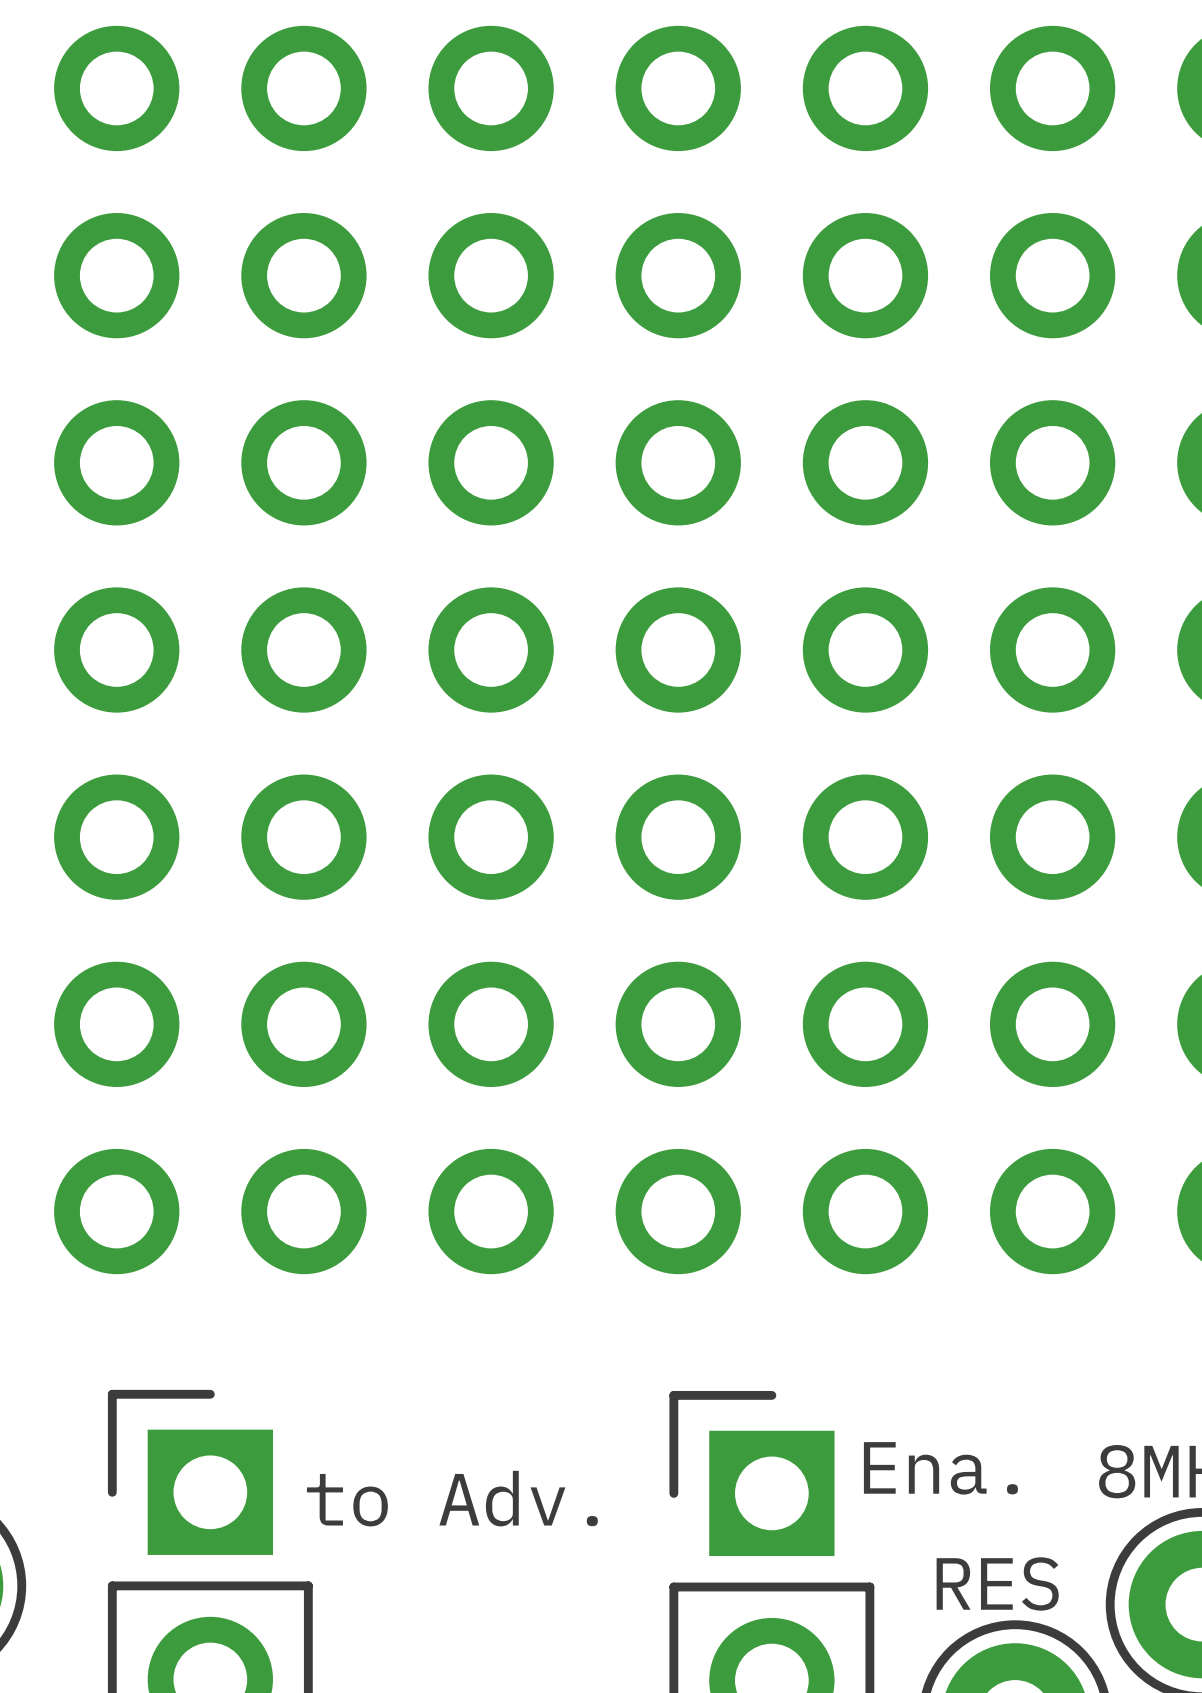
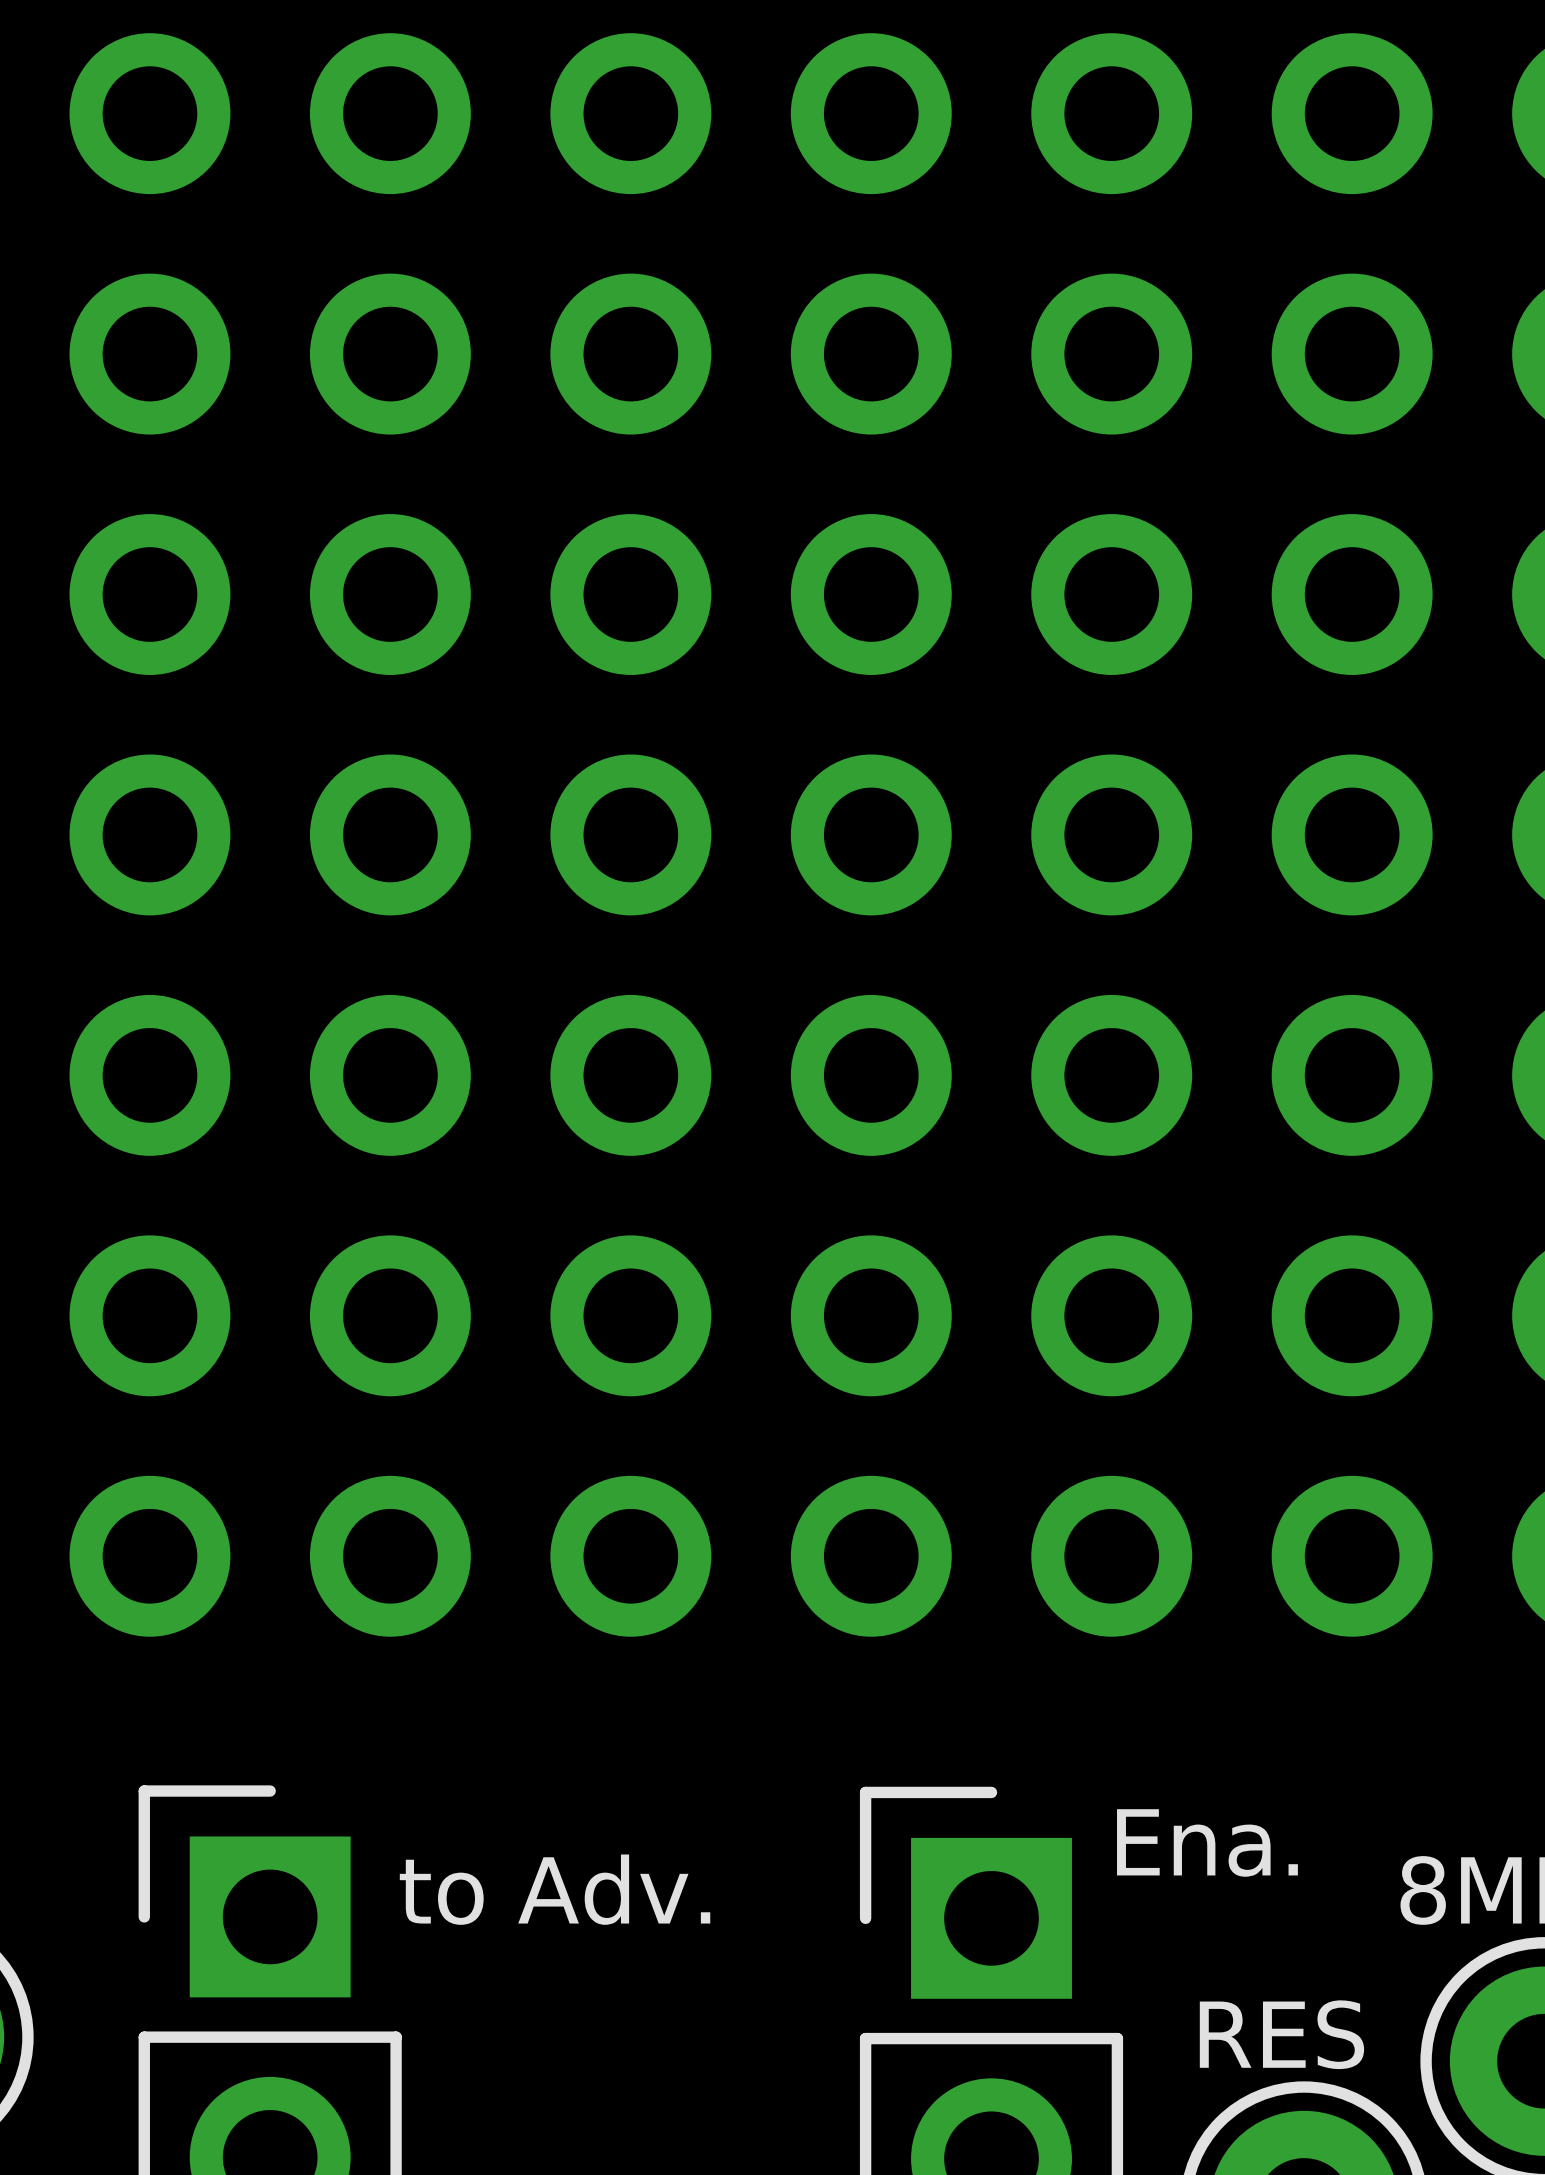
text position: Ena. (940, 1468) -> Ena. (1207, 1842)
text position: to Adv. (452, 1498) -> to Adv. (555, 1889)

